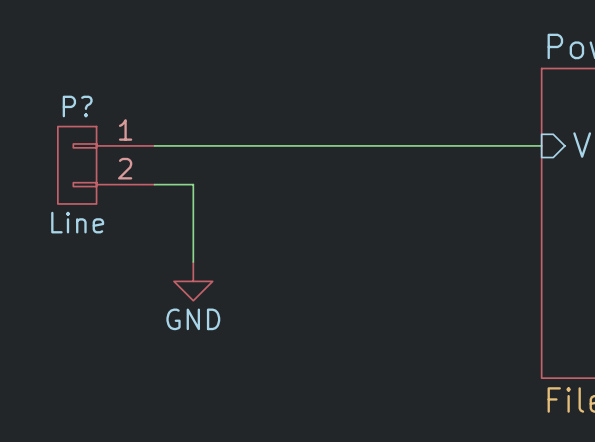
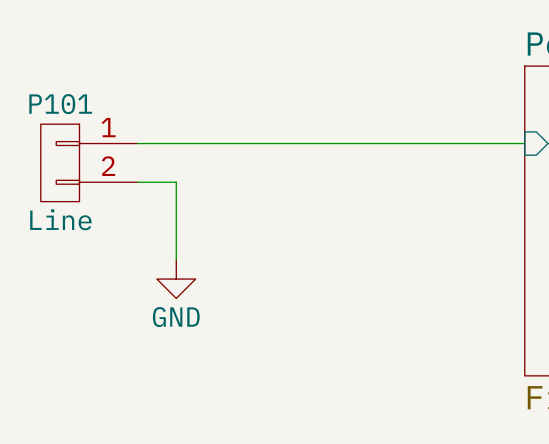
P? name: P? (77, 106) -> P101 (60, 104)

